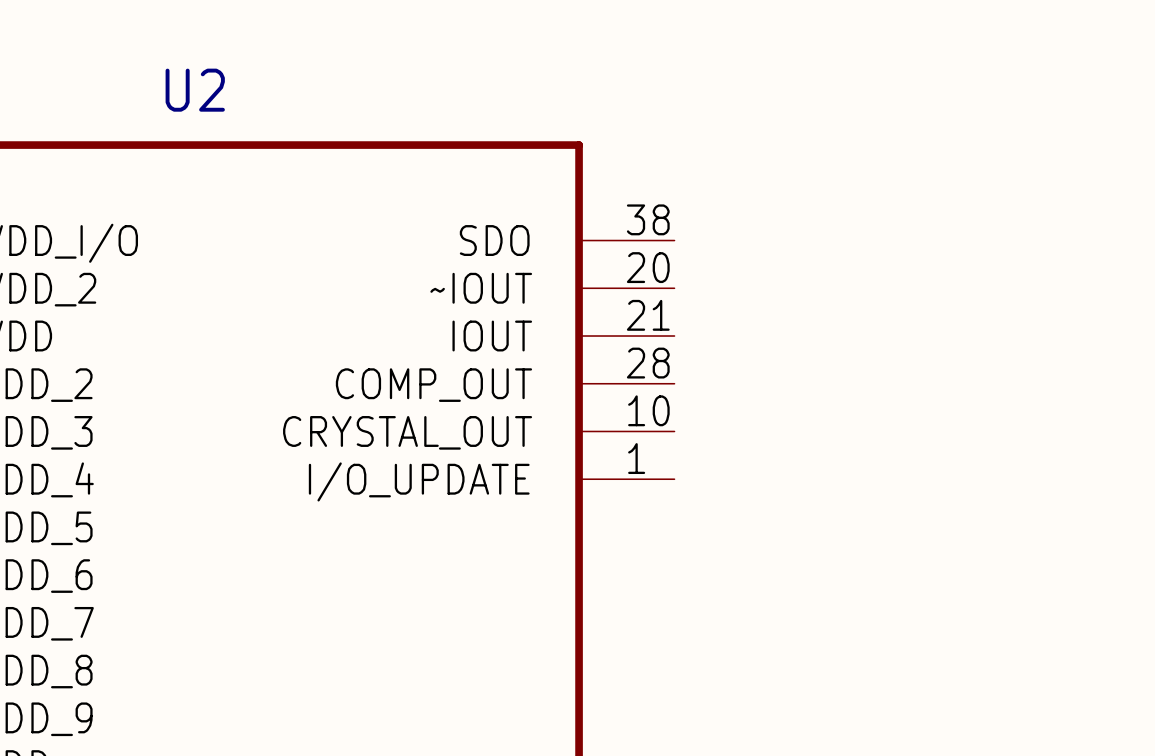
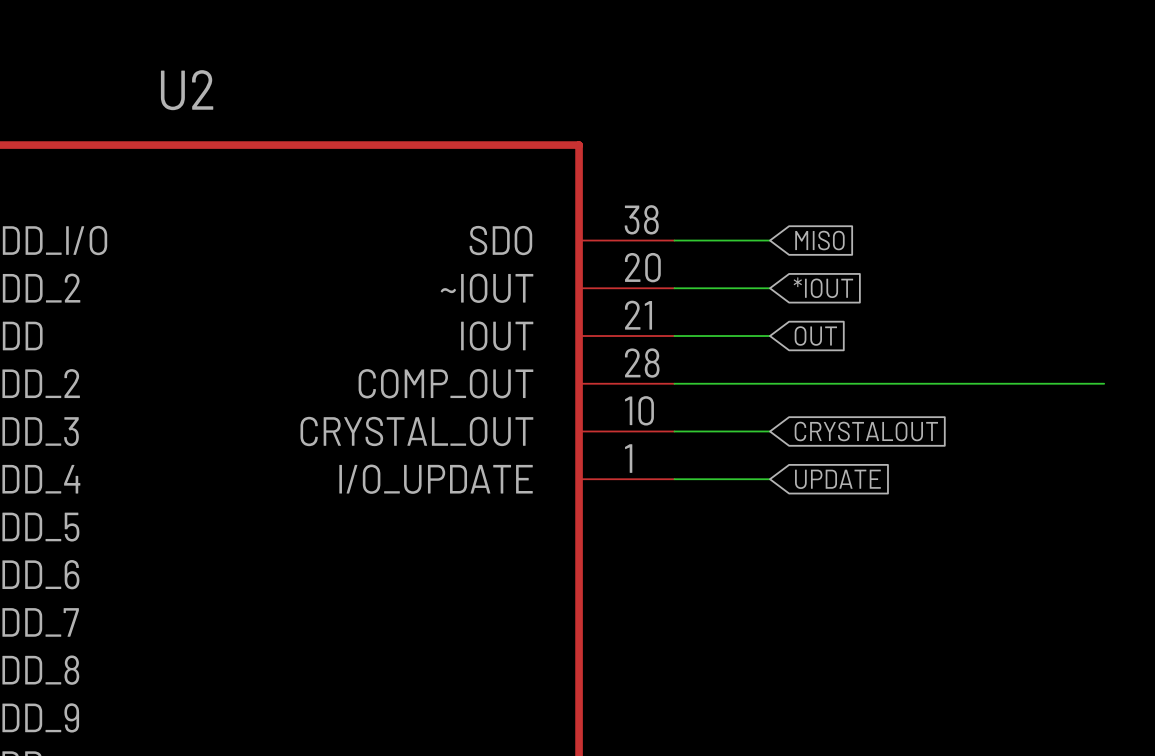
wire: none -> (674, 240) (770, 240)
global label: none -> MISO (819, 240)
wire: none -> (674, 288) (770, 288)
global label: none -> *IOUT (823, 287)
wire: none -> (674, 336) (770, 336)
global label: none -> OUT (815, 336)
wire: none -> (674, 383) (1104, 383)
wire: none -> (674, 431) (770, 431)
global label: none -> CRYSTALOUT (866, 431)
wire: none -> (674, 479) (770, 479)
global label: none -> UPDATE (837, 479)

